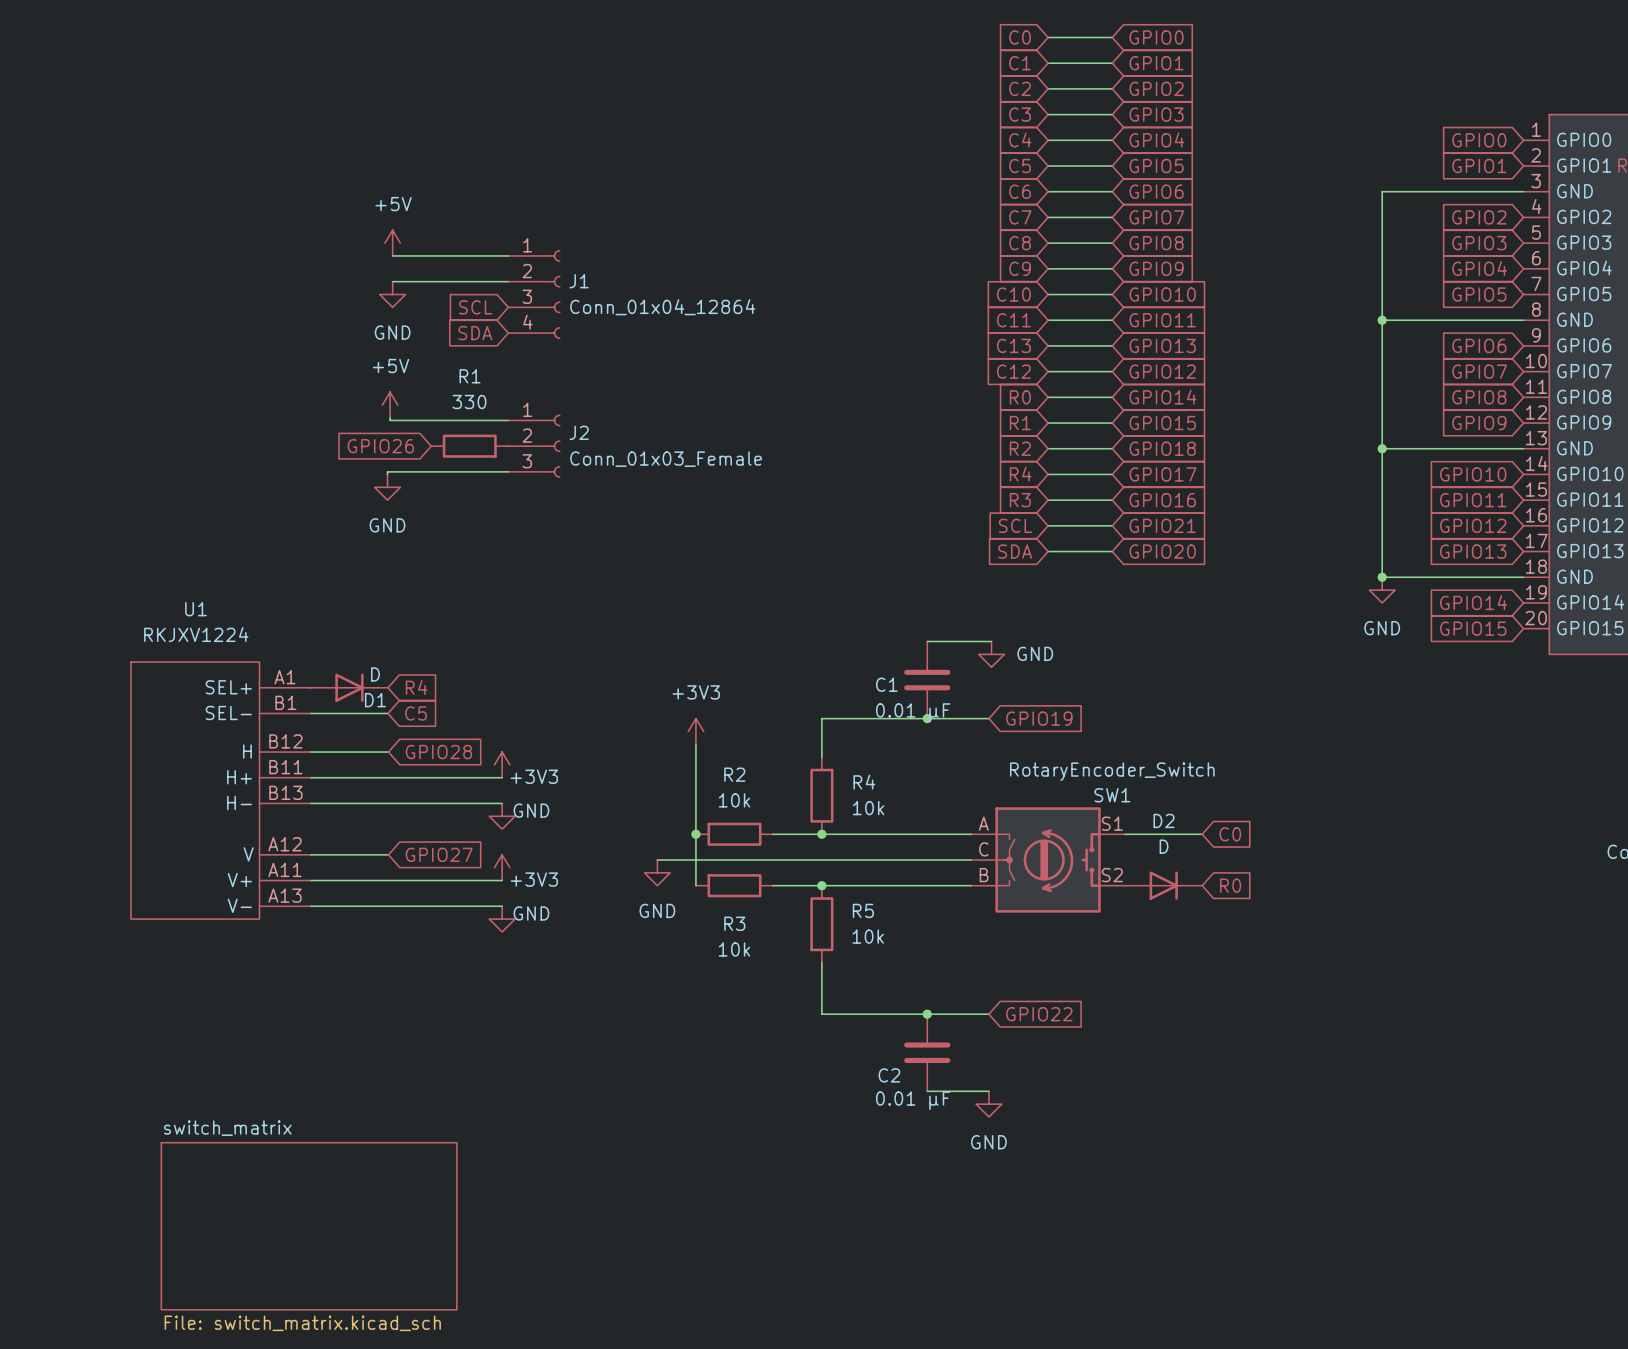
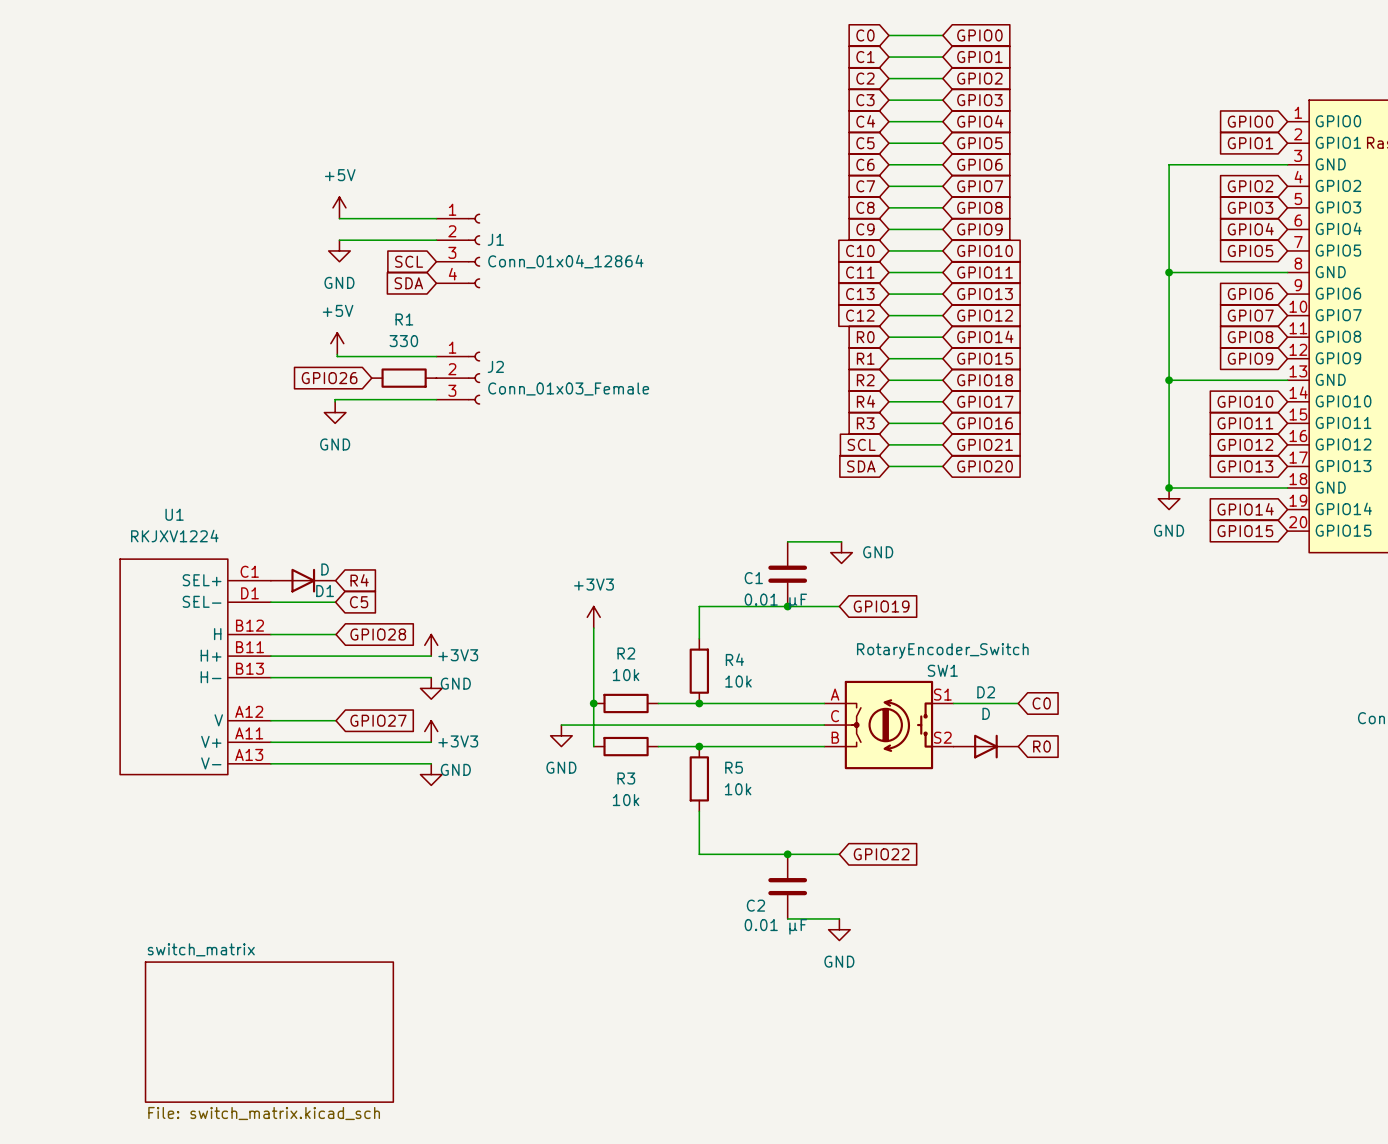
U1 pin number: A1 (285, 677) -> C1 (249, 571)
U1 pin number: B1 (285, 702) -> D1 (249, 593)

